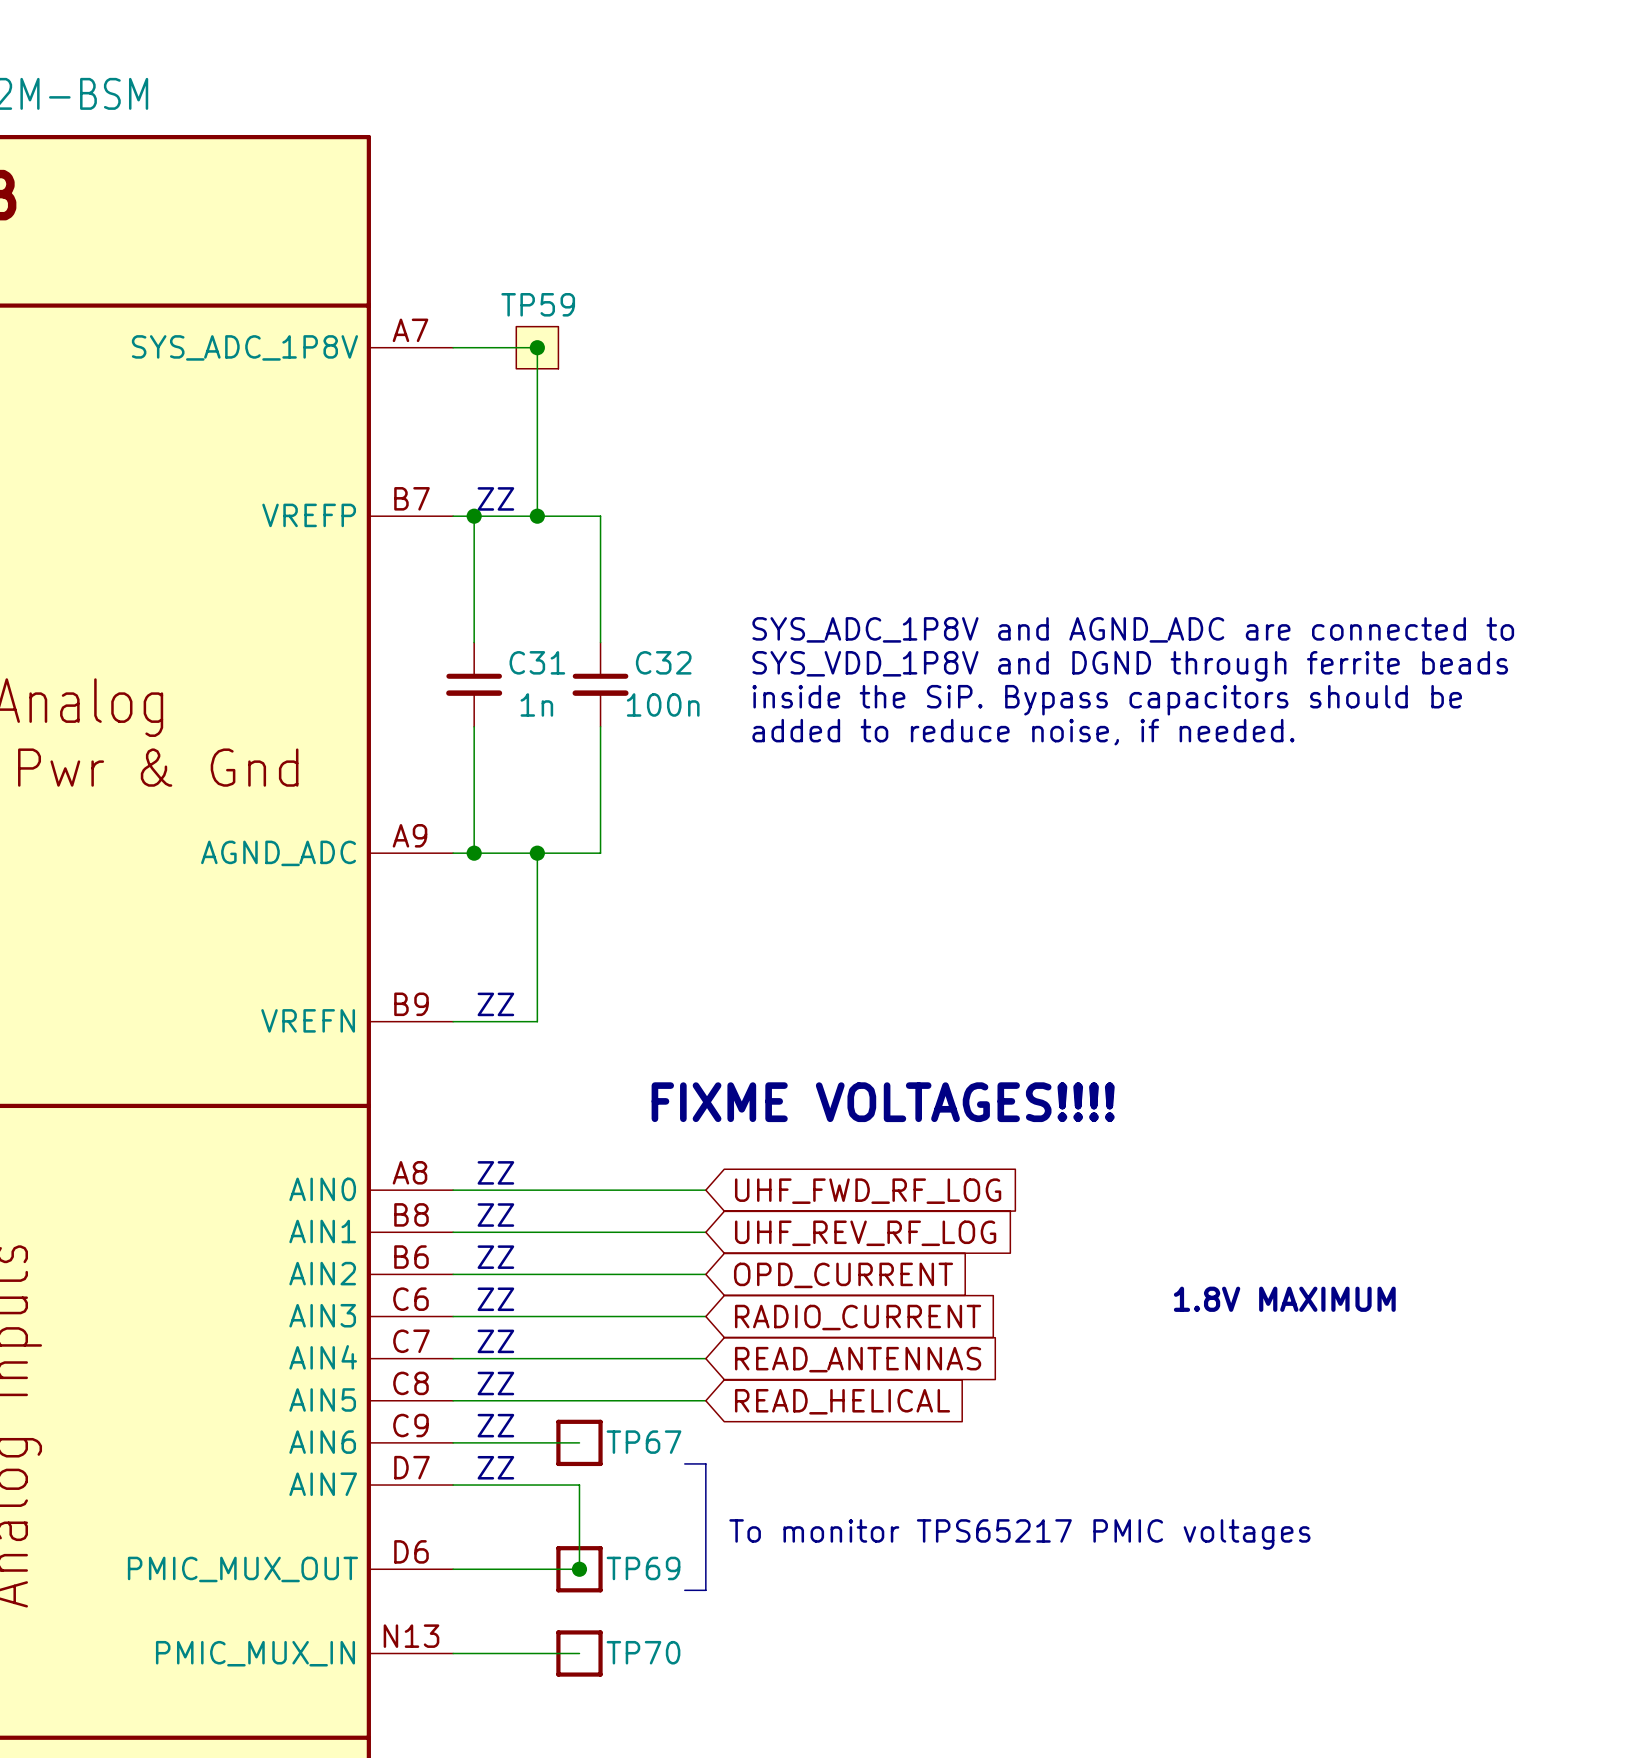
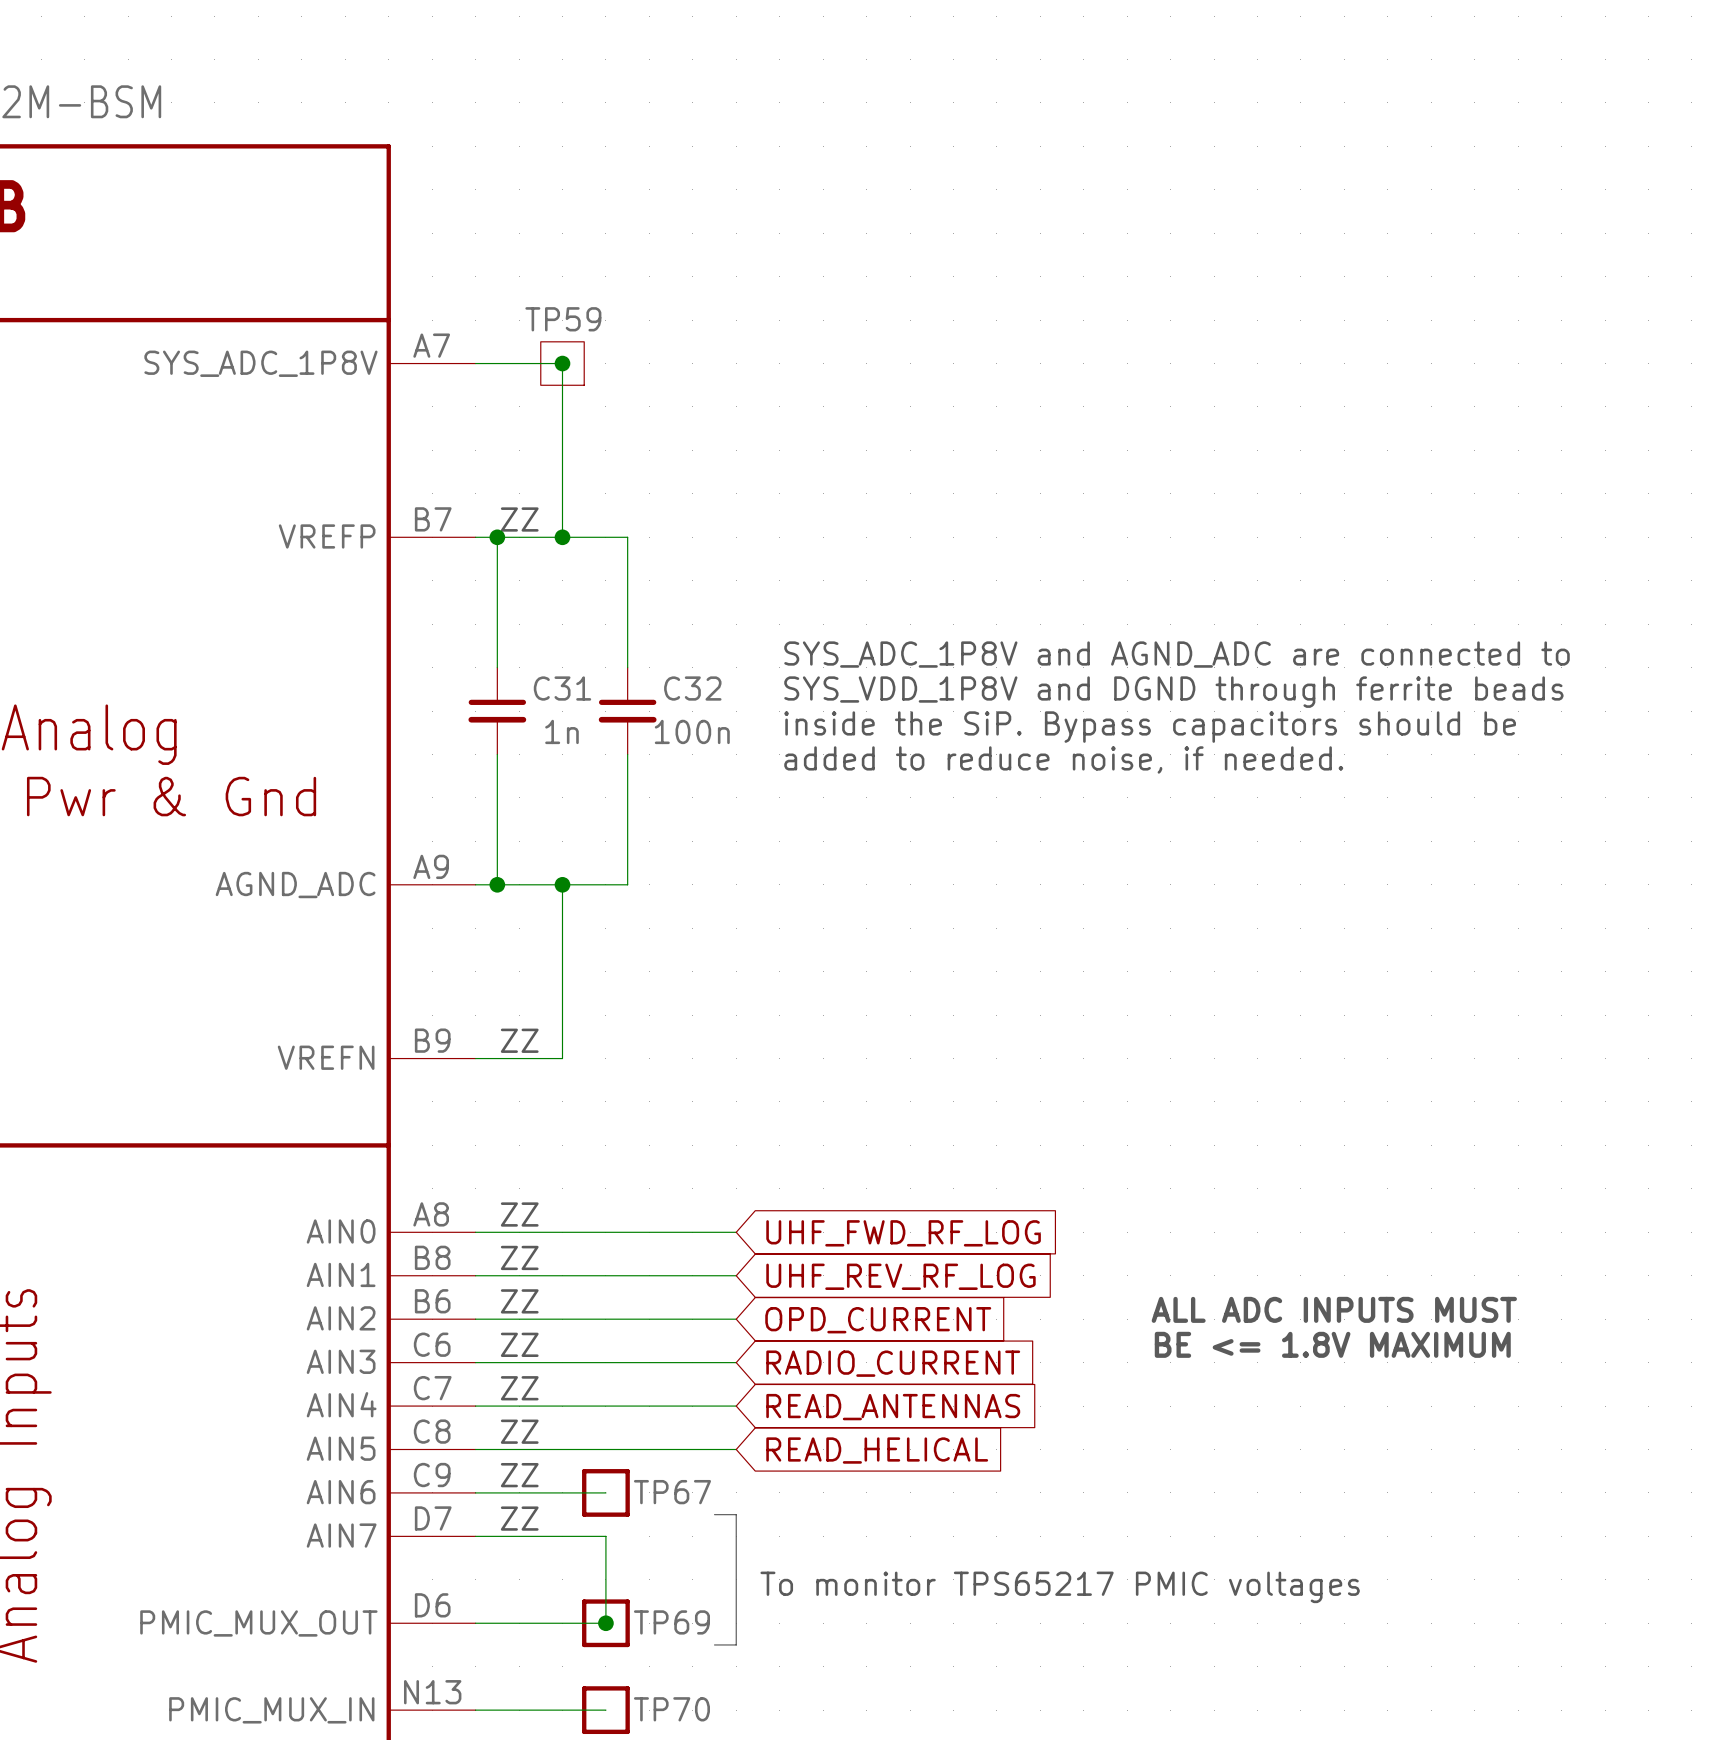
text: FIXME VOLTAGES!!!! (883, 1102) -> none
text: none -> ALL ADC INPUTS MUST (1334, 1309)
text: 1.8V MAXIMUM (1284, 1299) -> BE <= 1.8V MAXIMUM (1332, 1344)

